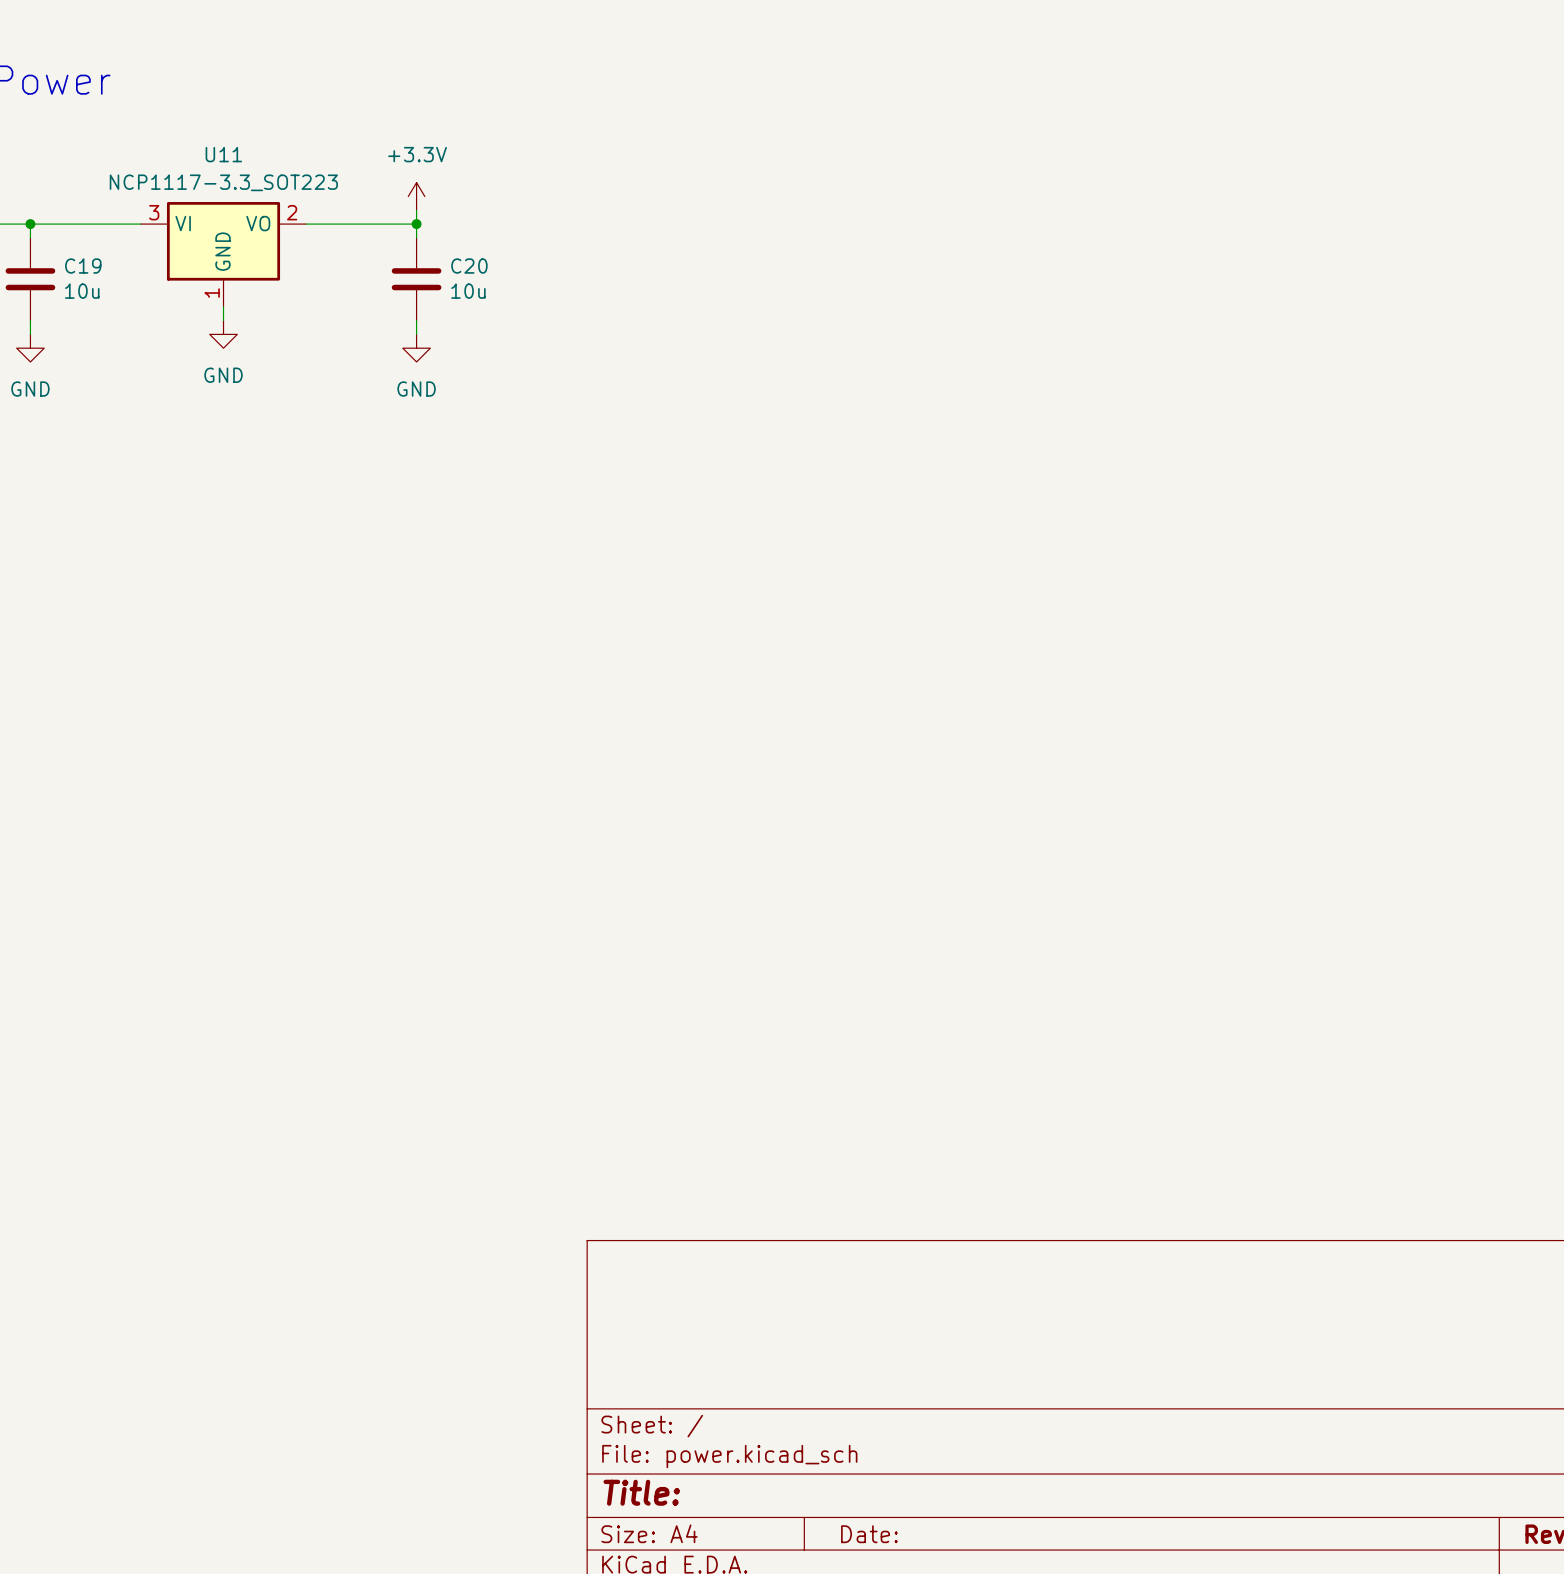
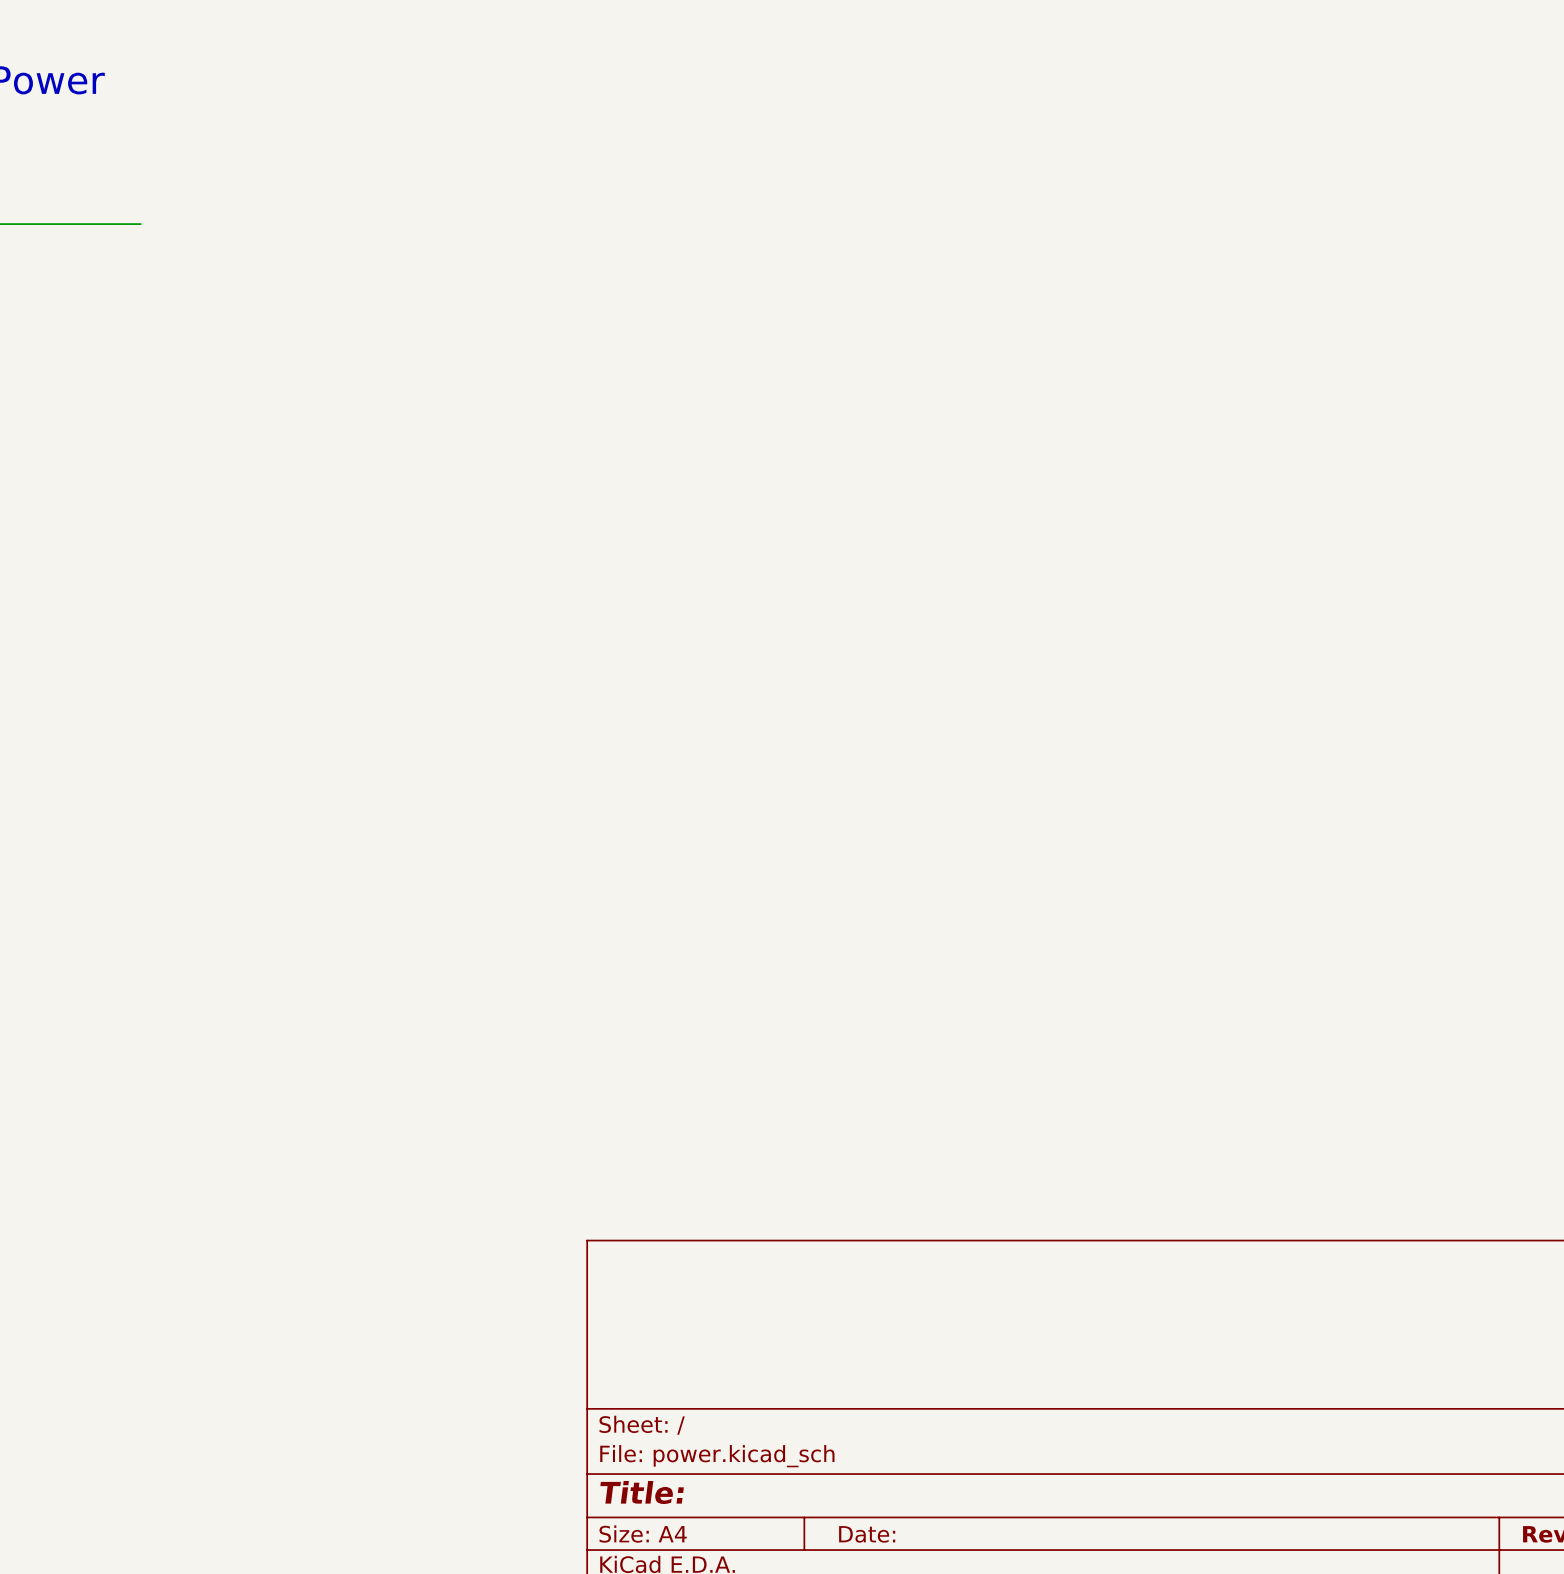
power symbol: +3.3V (416, 196) -> none
wire: (416, 210) (416, 237) -> none
wire: (30, 224) (30, 237) -> none
junction: (30, 224) -> none
wire: (306, 224) (416, 224) -> none
junction: (416, 224) -> none
U11: NCP1117-3.3_SOT223 (223, 254) -> none
C19: 10u (30, 279) -> none
C20: 10u (416, 279) -> none
wire: (223, 306) (223, 320) -> none
wire: (30, 320) (30, 334) -> none
wire: (416, 320) (416, 334) -> none
power symbol: GND (223, 334) -> none
power symbol: GND (30, 348) -> none
power symbol: GND (416, 348) -> none

